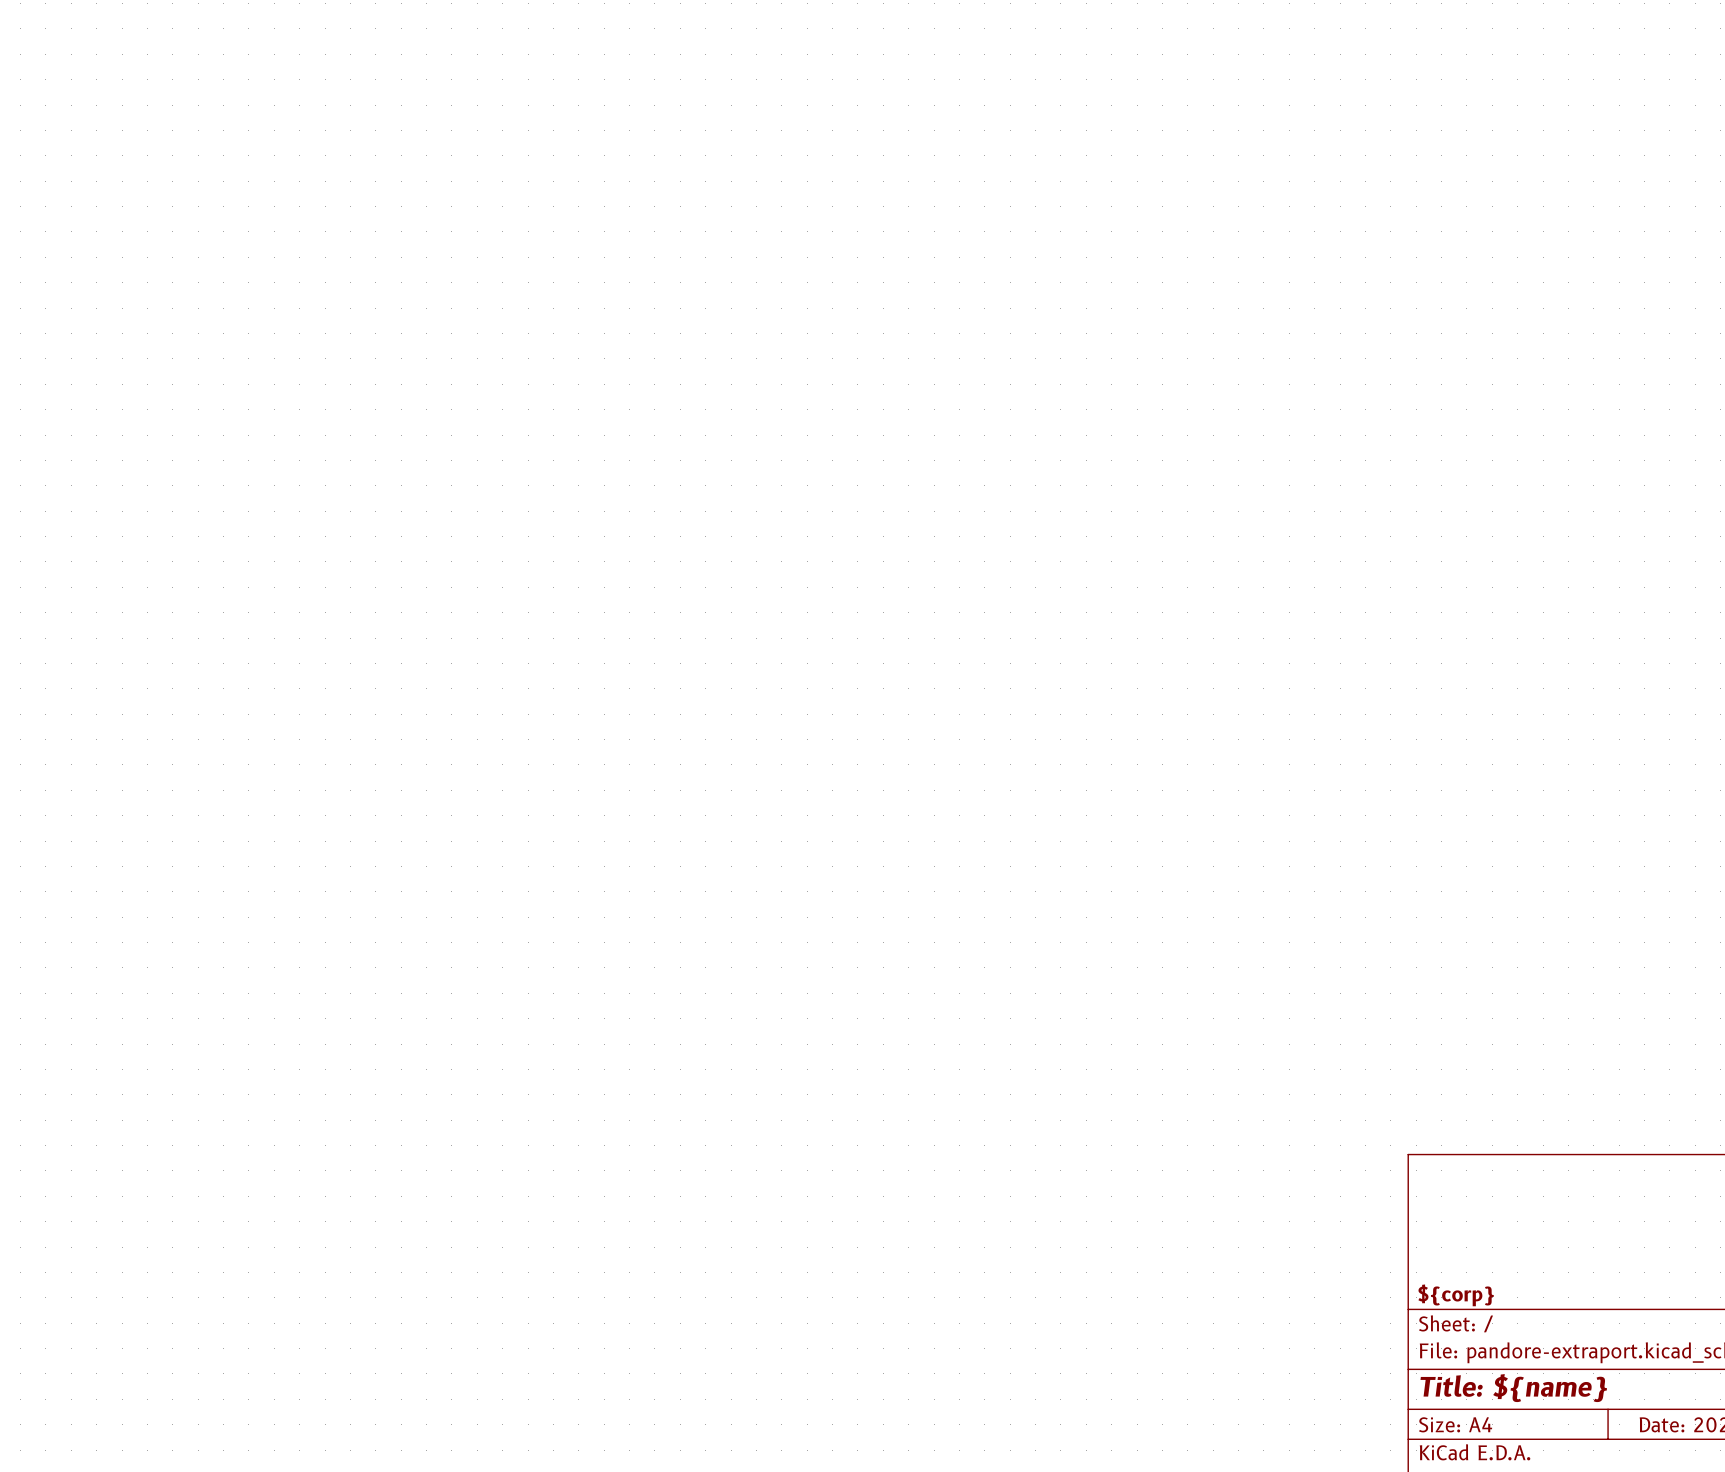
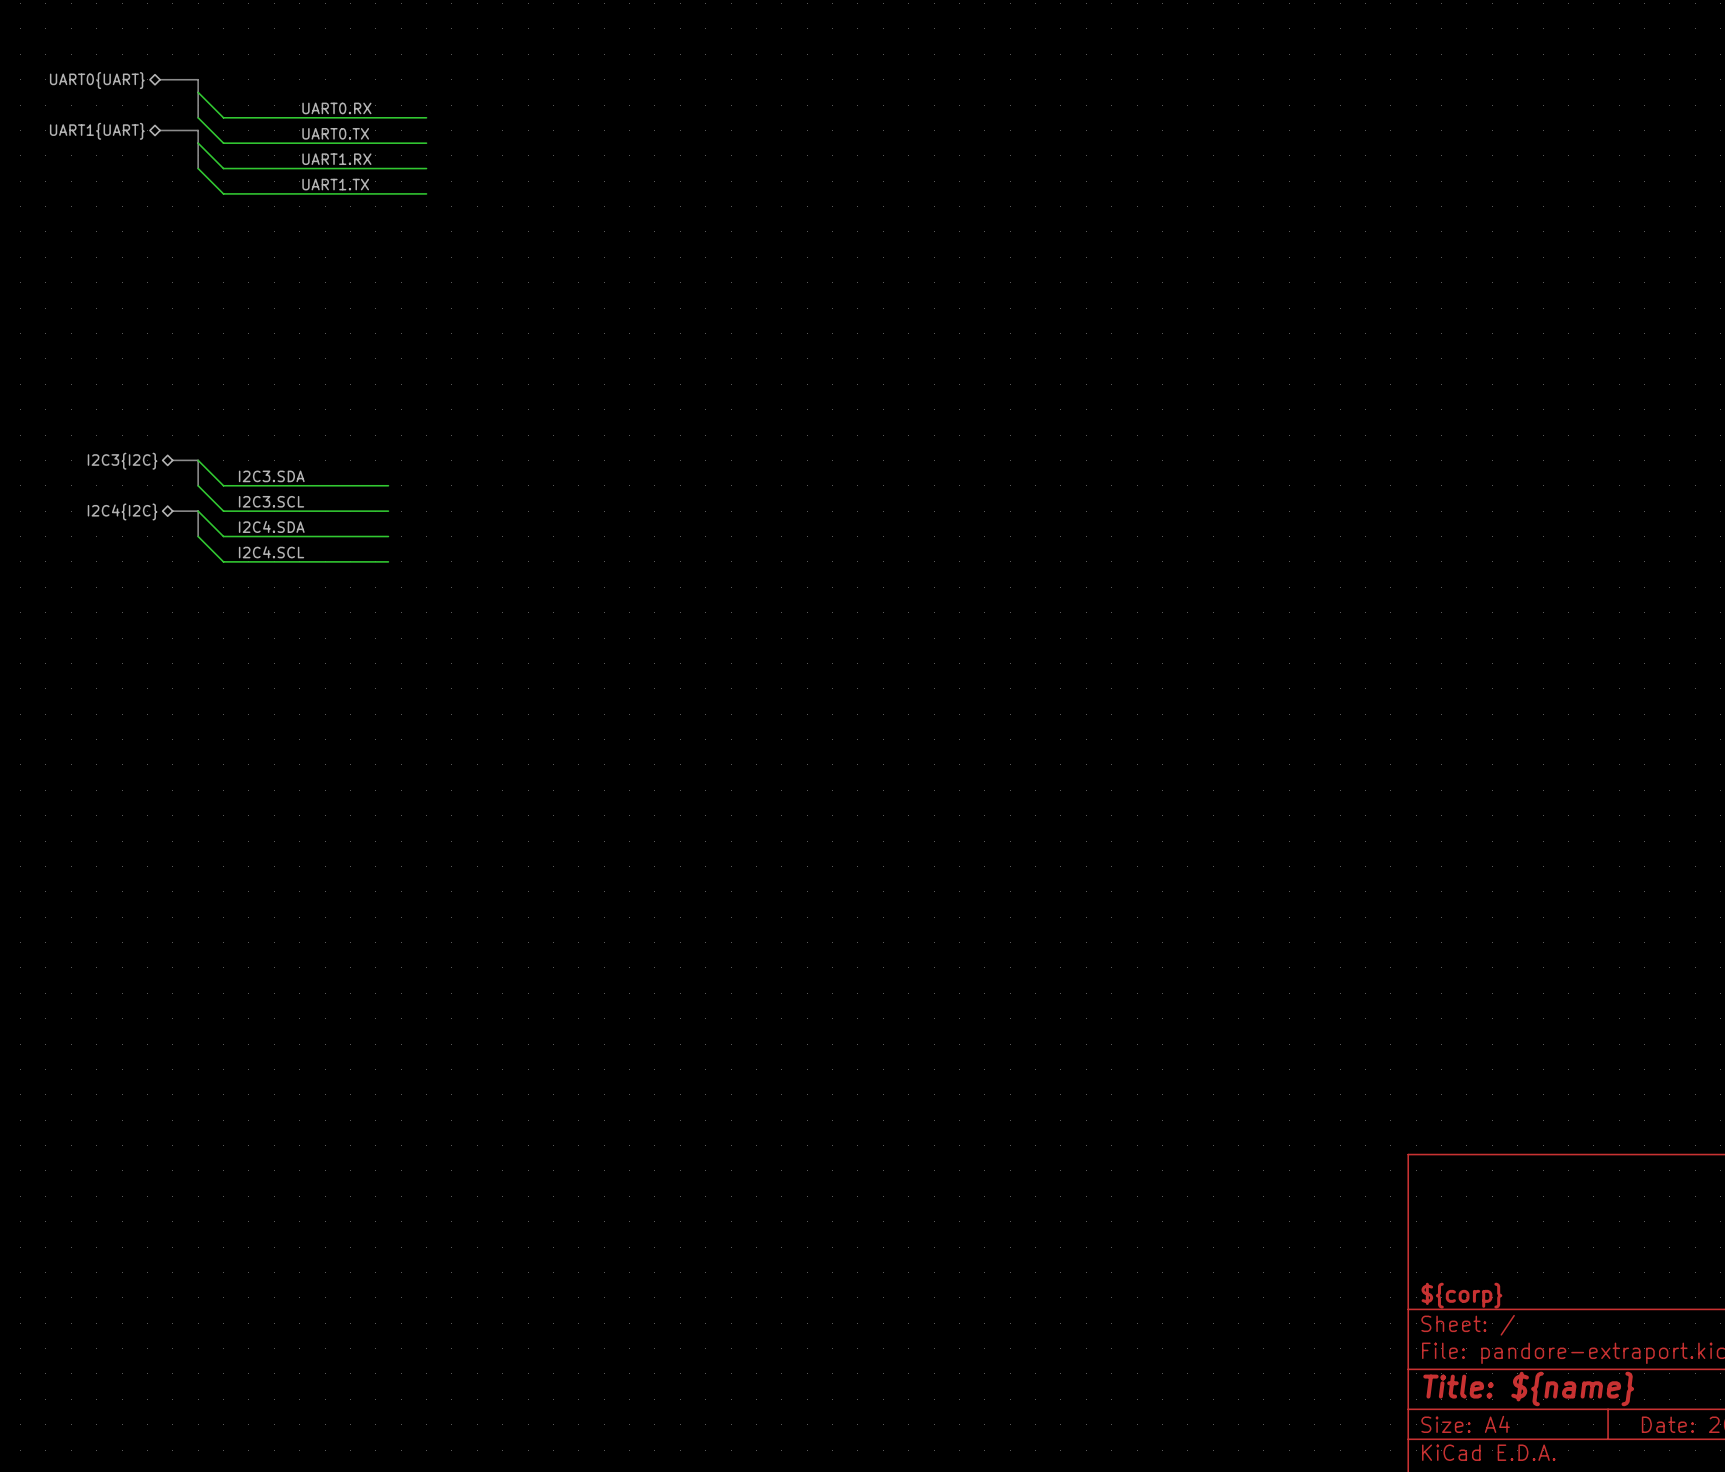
bus: none -> (160, 79) (198, 79) (198, 117)
hierarchical label: none -> UART0{UART} (97, 80)
wire: none -> (198, 92) (223, 117) (426, 117)
label: none -> UART0.RX (336, 108)
wire: none -> (198, 117) (223, 143) (426, 143)
bus: none -> (160, 130) (198, 130) (198, 168)
hierarchical label: none -> UART1{UART} (97, 131)
label: none -> UART0.TX (335, 133)
wire: none -> (198, 143) (223, 168) (426, 168)
label: none -> UART1.RX (336, 159)
wire: none -> (198, 168) (223, 193) (426, 193)
label: none -> UART1.TX (335, 184)
bus: none -> (172, 460) (198, 460) (198, 485)
wire: none -> (198, 460) (223, 485) (388, 485)
hierarchical label: none -> I2C3{I2C} (122, 461)
label: none -> I2C3.SDA (271, 476)
wire: none -> (198, 485) (223, 511) (388, 511)
label: none -> I2C3.SCL (271, 501)
bus: none -> (172, 511) (198, 511) (198, 536)
wire: none -> (198, 511) (223, 536) (388, 536)
hierarchical label: none -> I2C4{I2C} (122, 511)
label: none -> I2C4.SDA (271, 526)
wire: none -> (198, 536) (223, 561) (388, 561)
label: none -> I2C4.SCL (271, 552)

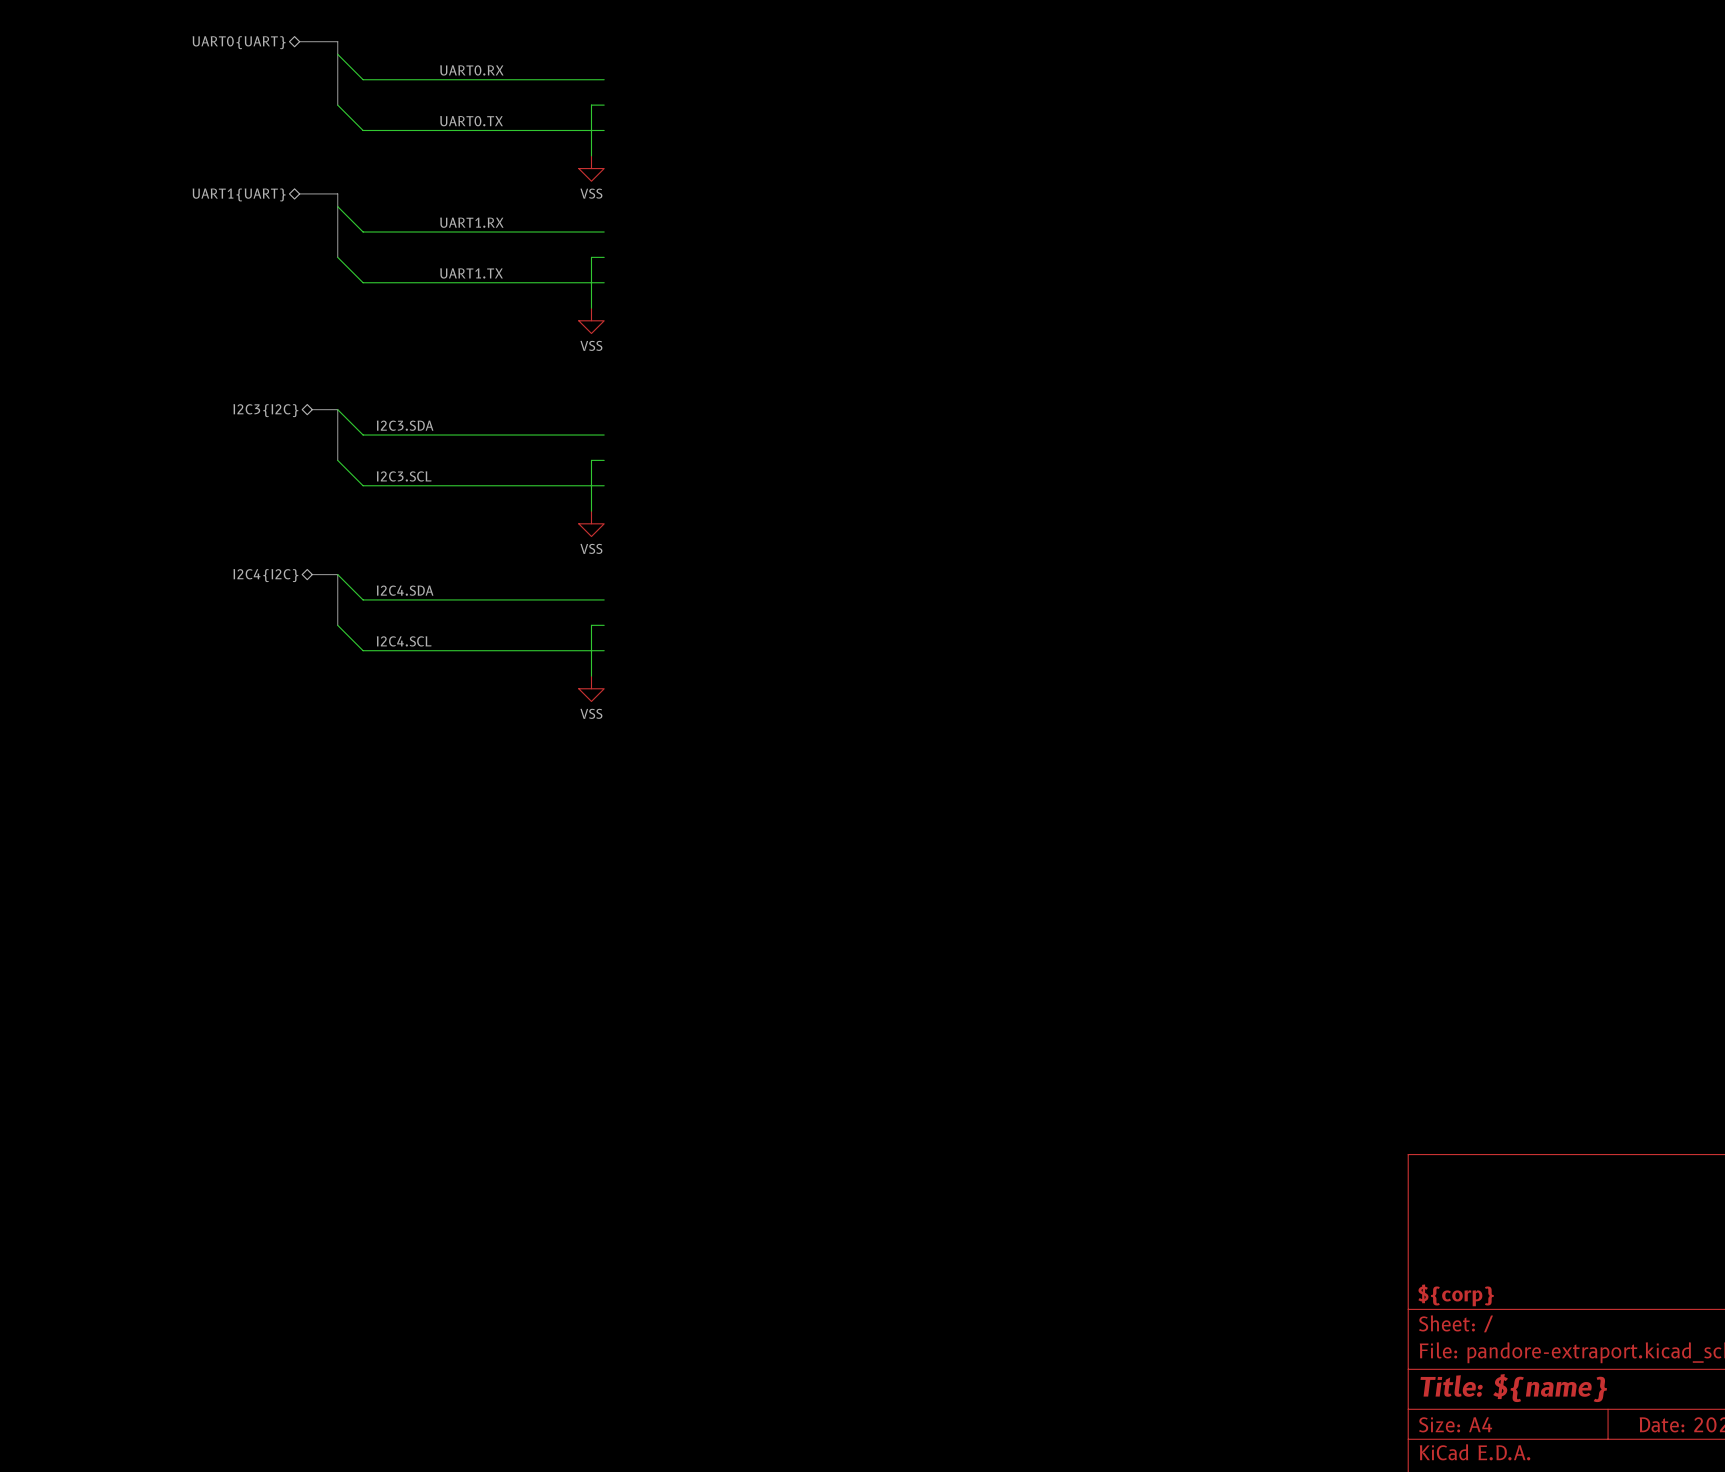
bus: none -> (299, 41) (337, 41) (337, 105)
wire: none -> (337, 54) (363, 79) (604, 79)
bus: (160, 79) (198, 79) (198, 117) -> none
hierarchical label position: UART0{UART} (97, 80) -> UART0{UART} (239, 42)
wire: (198, 92) (223, 117) (426, 117) -> none
wire: none -> (337, 105) (363, 130) (604, 130)
wire: none -> (604, 105) (591, 105) (591, 155)
label position: UART0.RX (336, 108) -> UART0.RX (471, 70)
wire: (198, 117) (223, 143) (426, 143) -> none
bus: (160, 130) (198, 130) (198, 168) -> none
hierarchical label position: UART1{UART} (97, 131) -> UART1{UART} (239, 194)
label position: UART0.TX (335, 133) -> UART0.TX (471, 121)
wire: (198, 143) (223, 168) (426, 168) -> none
label position: UART1.RX (336, 159) -> UART1.RX (471, 222)
wire: (198, 168) (223, 193) (426, 193) -> none
power symbol: none -> VSS (591, 168)
label position: UART1.TX (335, 184) -> UART1.TX (471, 273)
bus: none -> (299, 193) (337, 193) (337, 257)
wire: none -> (337, 206) (363, 231) (604, 231)
wire: none -> (337, 257) (363, 282) (604, 282)
wire: none -> (604, 257) (591, 257) (591, 308)
power symbol: none -> VSS (591, 320)
bus: none -> (312, 409) (337, 409) (337, 460)
wire: none -> (337, 409) (363, 435) (604, 435)
bus: (172, 460) (198, 460) (198, 485) -> none
wire: (198, 460) (223, 485) (363, 485) -> (337, 460) (363, 485)
wire: none -> (604, 460) (591, 460) (591, 511)
hierarchical label position: I2C3{I2C} (122, 461) -> I2C3{I2C} (265, 410)
label position: I2C3.SDA (271, 476) -> I2C3.SDA (405, 425)
wire: (198, 485) (223, 511) (388, 511) -> none
wire: none -> (388, 485) (604, 485)
label position: I2C3.SCL (271, 501) -> I2C3.SCL (404, 476)
hierarchical label position: I2C4{I2C} (122, 511) -> I2C4{I2C} (265, 575)
bus: (172, 511) (198, 511) (198, 536) -> none
wire: (198, 511) (223, 536) (388, 536) -> none
power symbol: none -> VSS (591, 523)
label position: I2C4.SDA (271, 526) -> I2C4.SDA (405, 590)
wire: (198, 536) (223, 561) (388, 561) -> none
label position: I2C4.SCL (271, 552) -> I2C4.SCL (404, 641)
bus: none -> (312, 574) (337, 574) (337, 625)
wire: none -> (337, 574) (363, 599) (604, 599)
wire: none -> (337, 625) (363, 650) (604, 650)
wire: none -> (604, 625) (591, 625) (591, 676)
power symbol: none -> VSS (591, 688)

